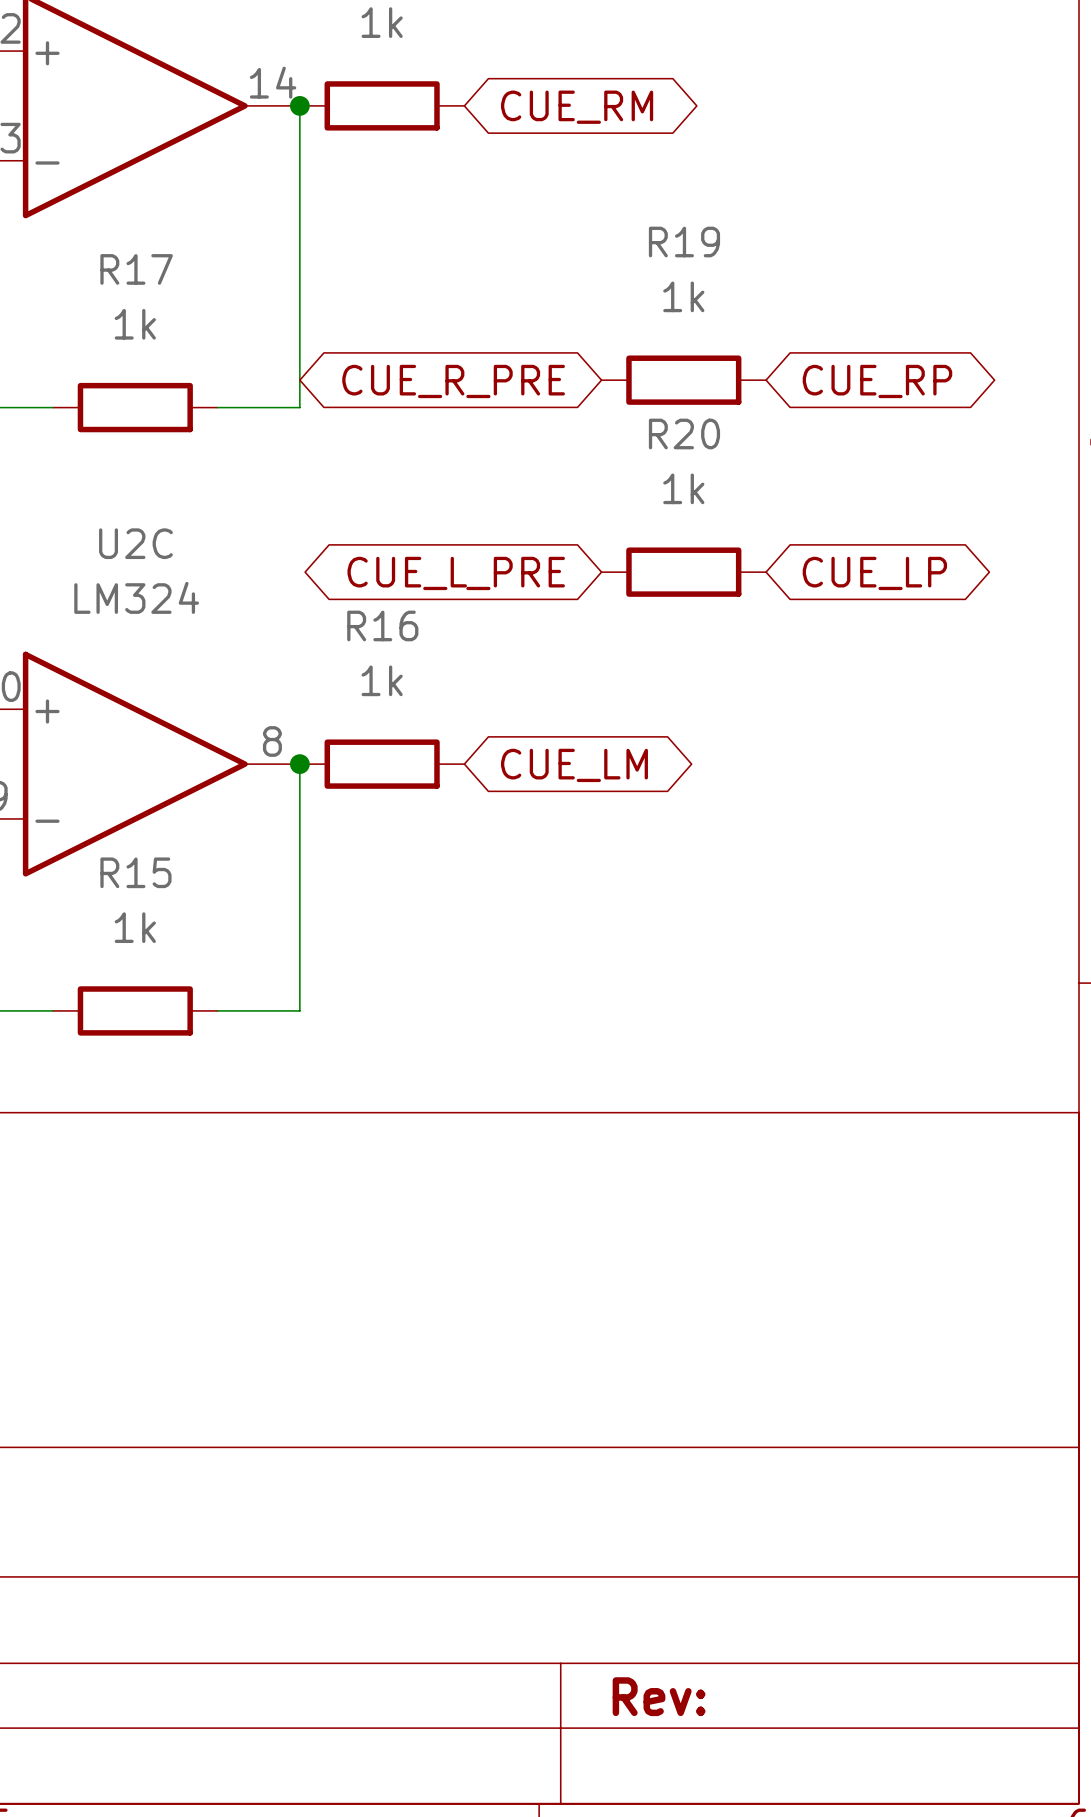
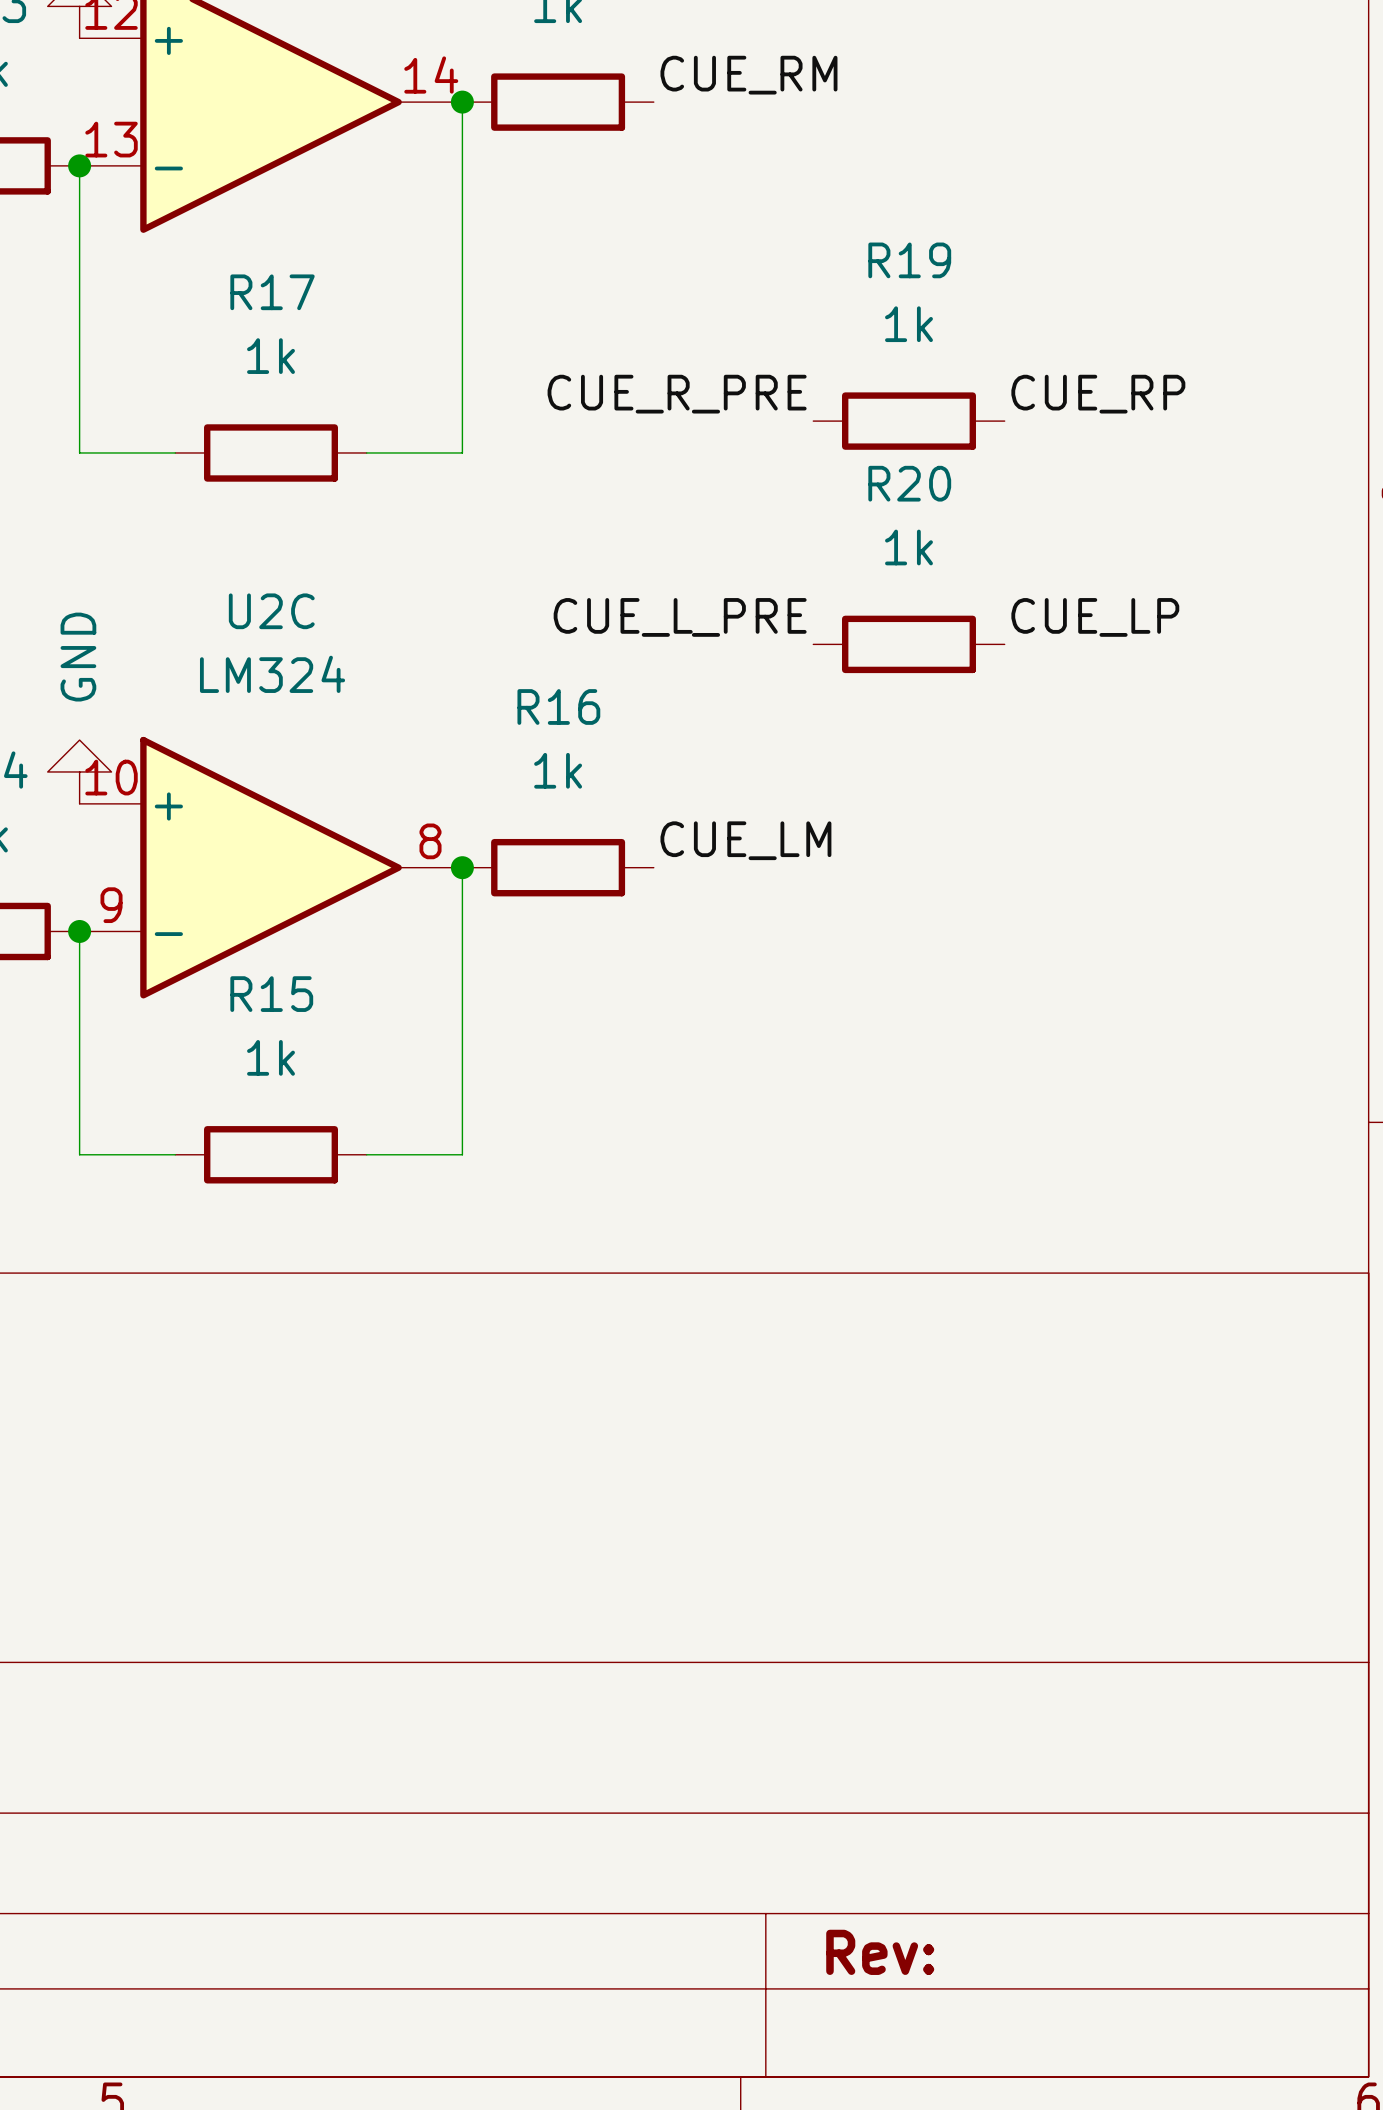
label: none -> CUE_RM (748, 75)
global label: CUE_RM (577, 107) -> none
label: none -> CUE_R_PRE (677, 394)
label: none -> CUE_RP (1098, 394)
global label: CUE_R_PRE (453, 381) -> none
global label: CUE_RP (877, 381) -> none
label: none -> CUE_L_PRE (680, 617)
label: none -> CUE_LP (1095, 617)
global label: CUE_L_PRE (456, 573) -> none
global label: CUE_LP (874, 573) -> none
label: none -> CUE_LM (745, 840)
global label: CUE_LM (574, 765) -> none

